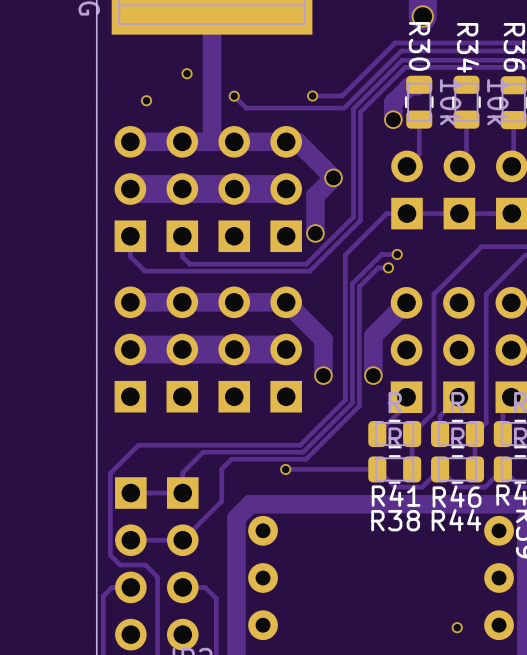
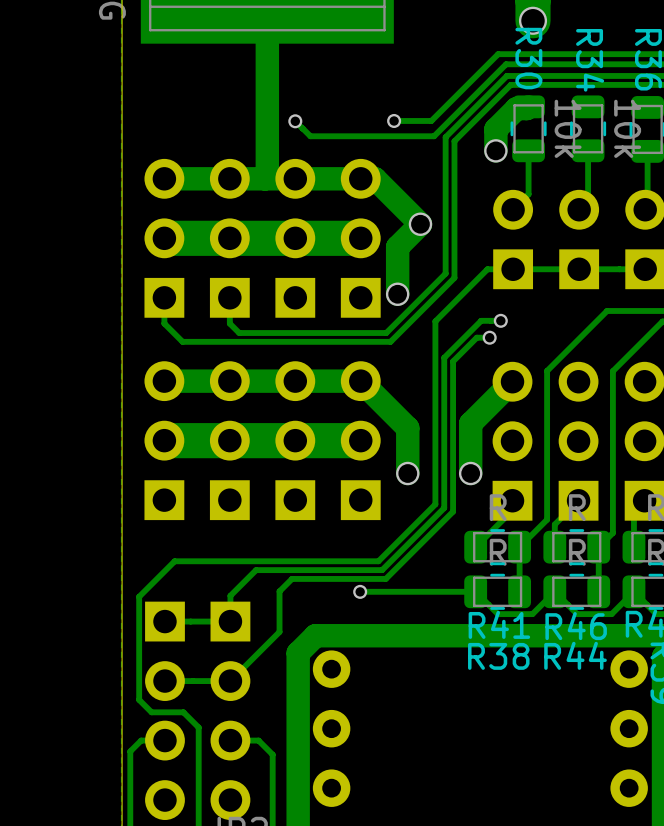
via: (187, 73) -> none
via: (146, 100) -> none
via: (457, 627) -> none

